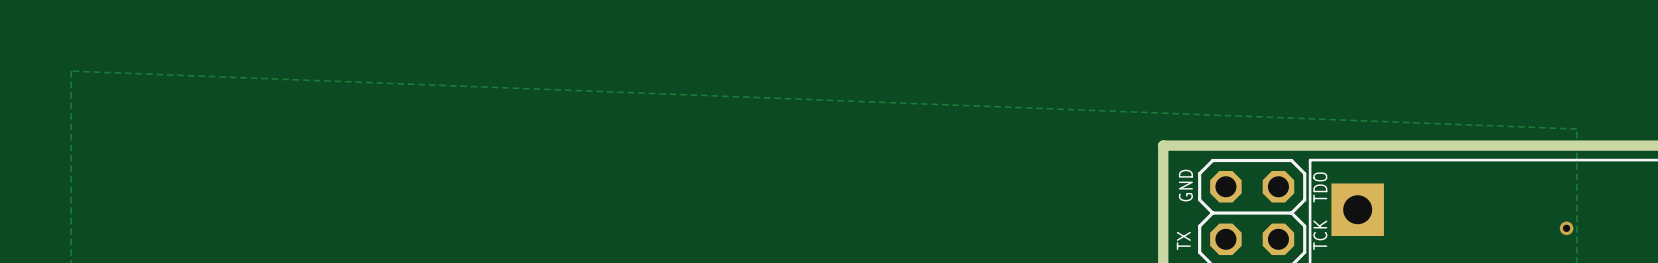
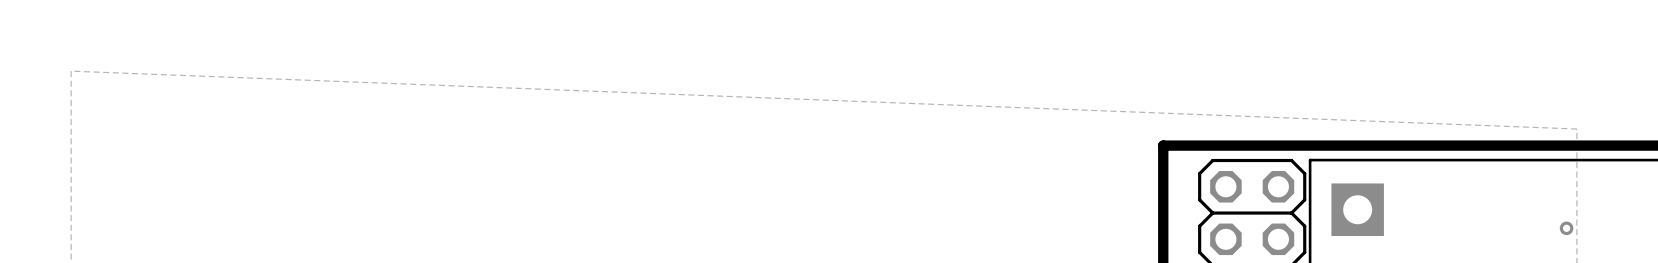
text: GND (1185, 185) -> none
text: TDO (1320, 187) -> none
text: TCK (1320, 235) -> none
text: TX (1183, 240) -> none

